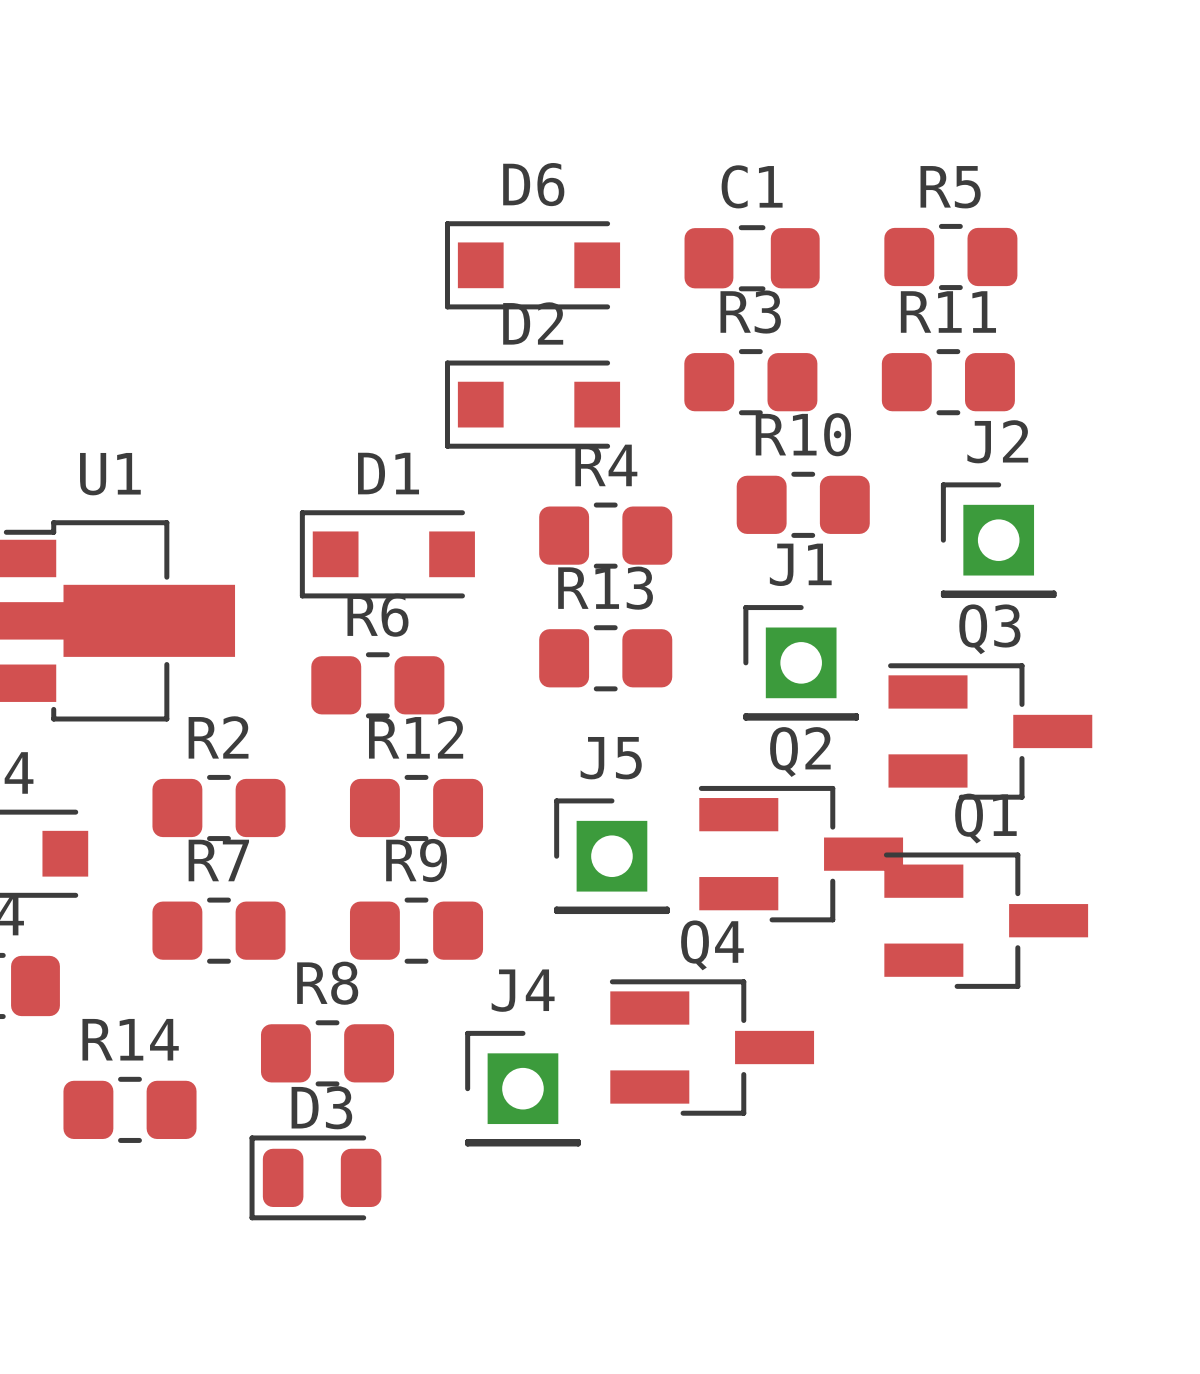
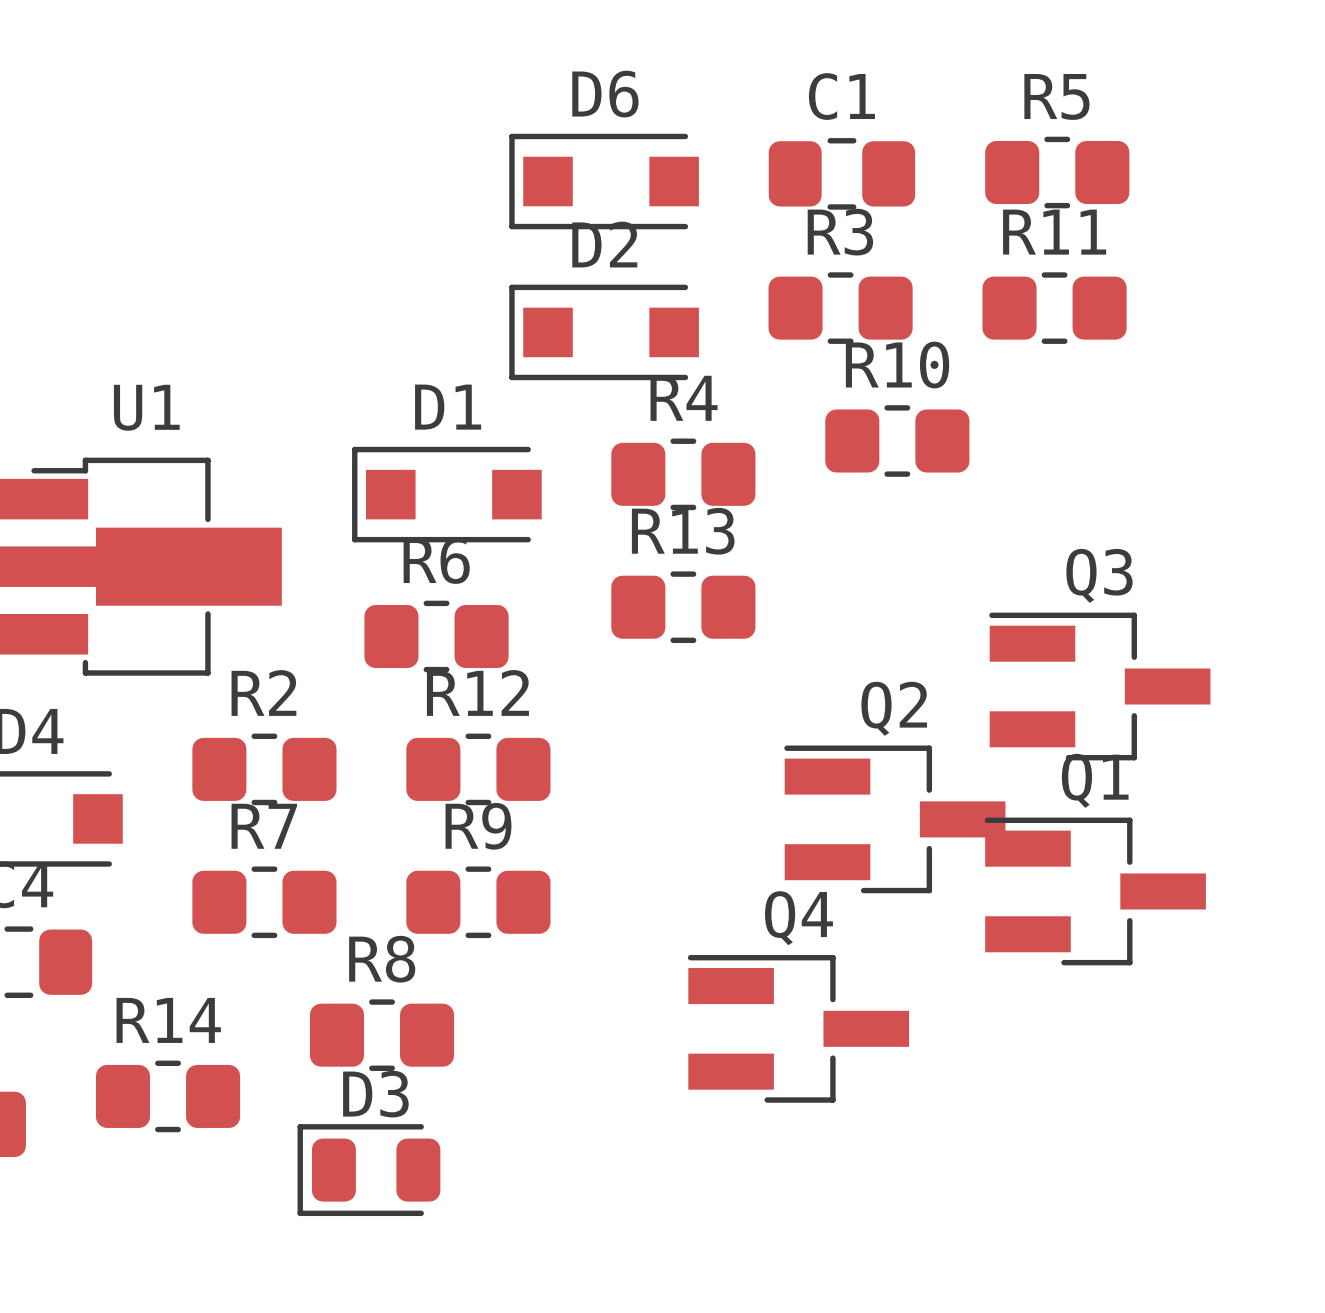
J2: (998, 540) -> none
J1: (801, 662) -> none
J5: (611, 856) -> none
J4: (522, 1088) -> none

